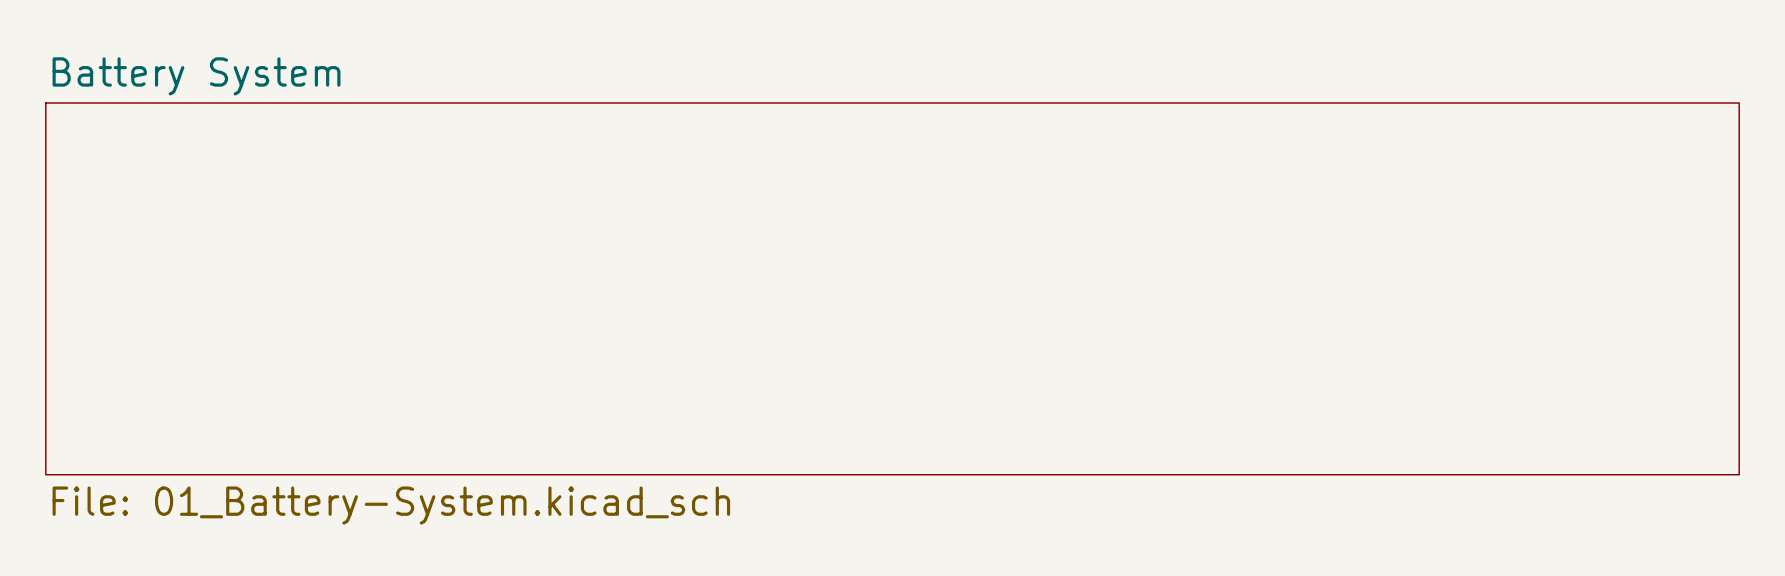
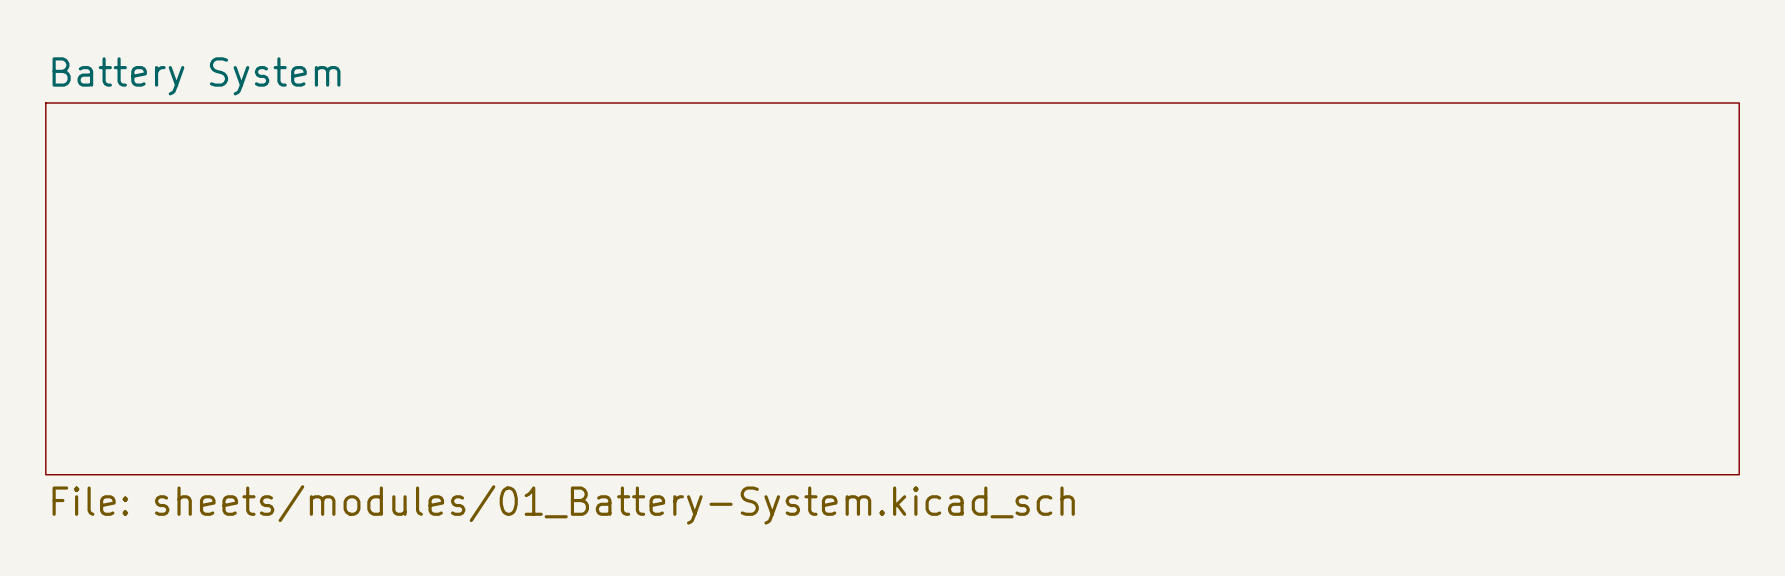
sheet Battery System value: File: 01_Battery-System.kicad_sch (391, 505) -> File: sheets/modules/01_Battery-System.kicad_sch (563, 504)

